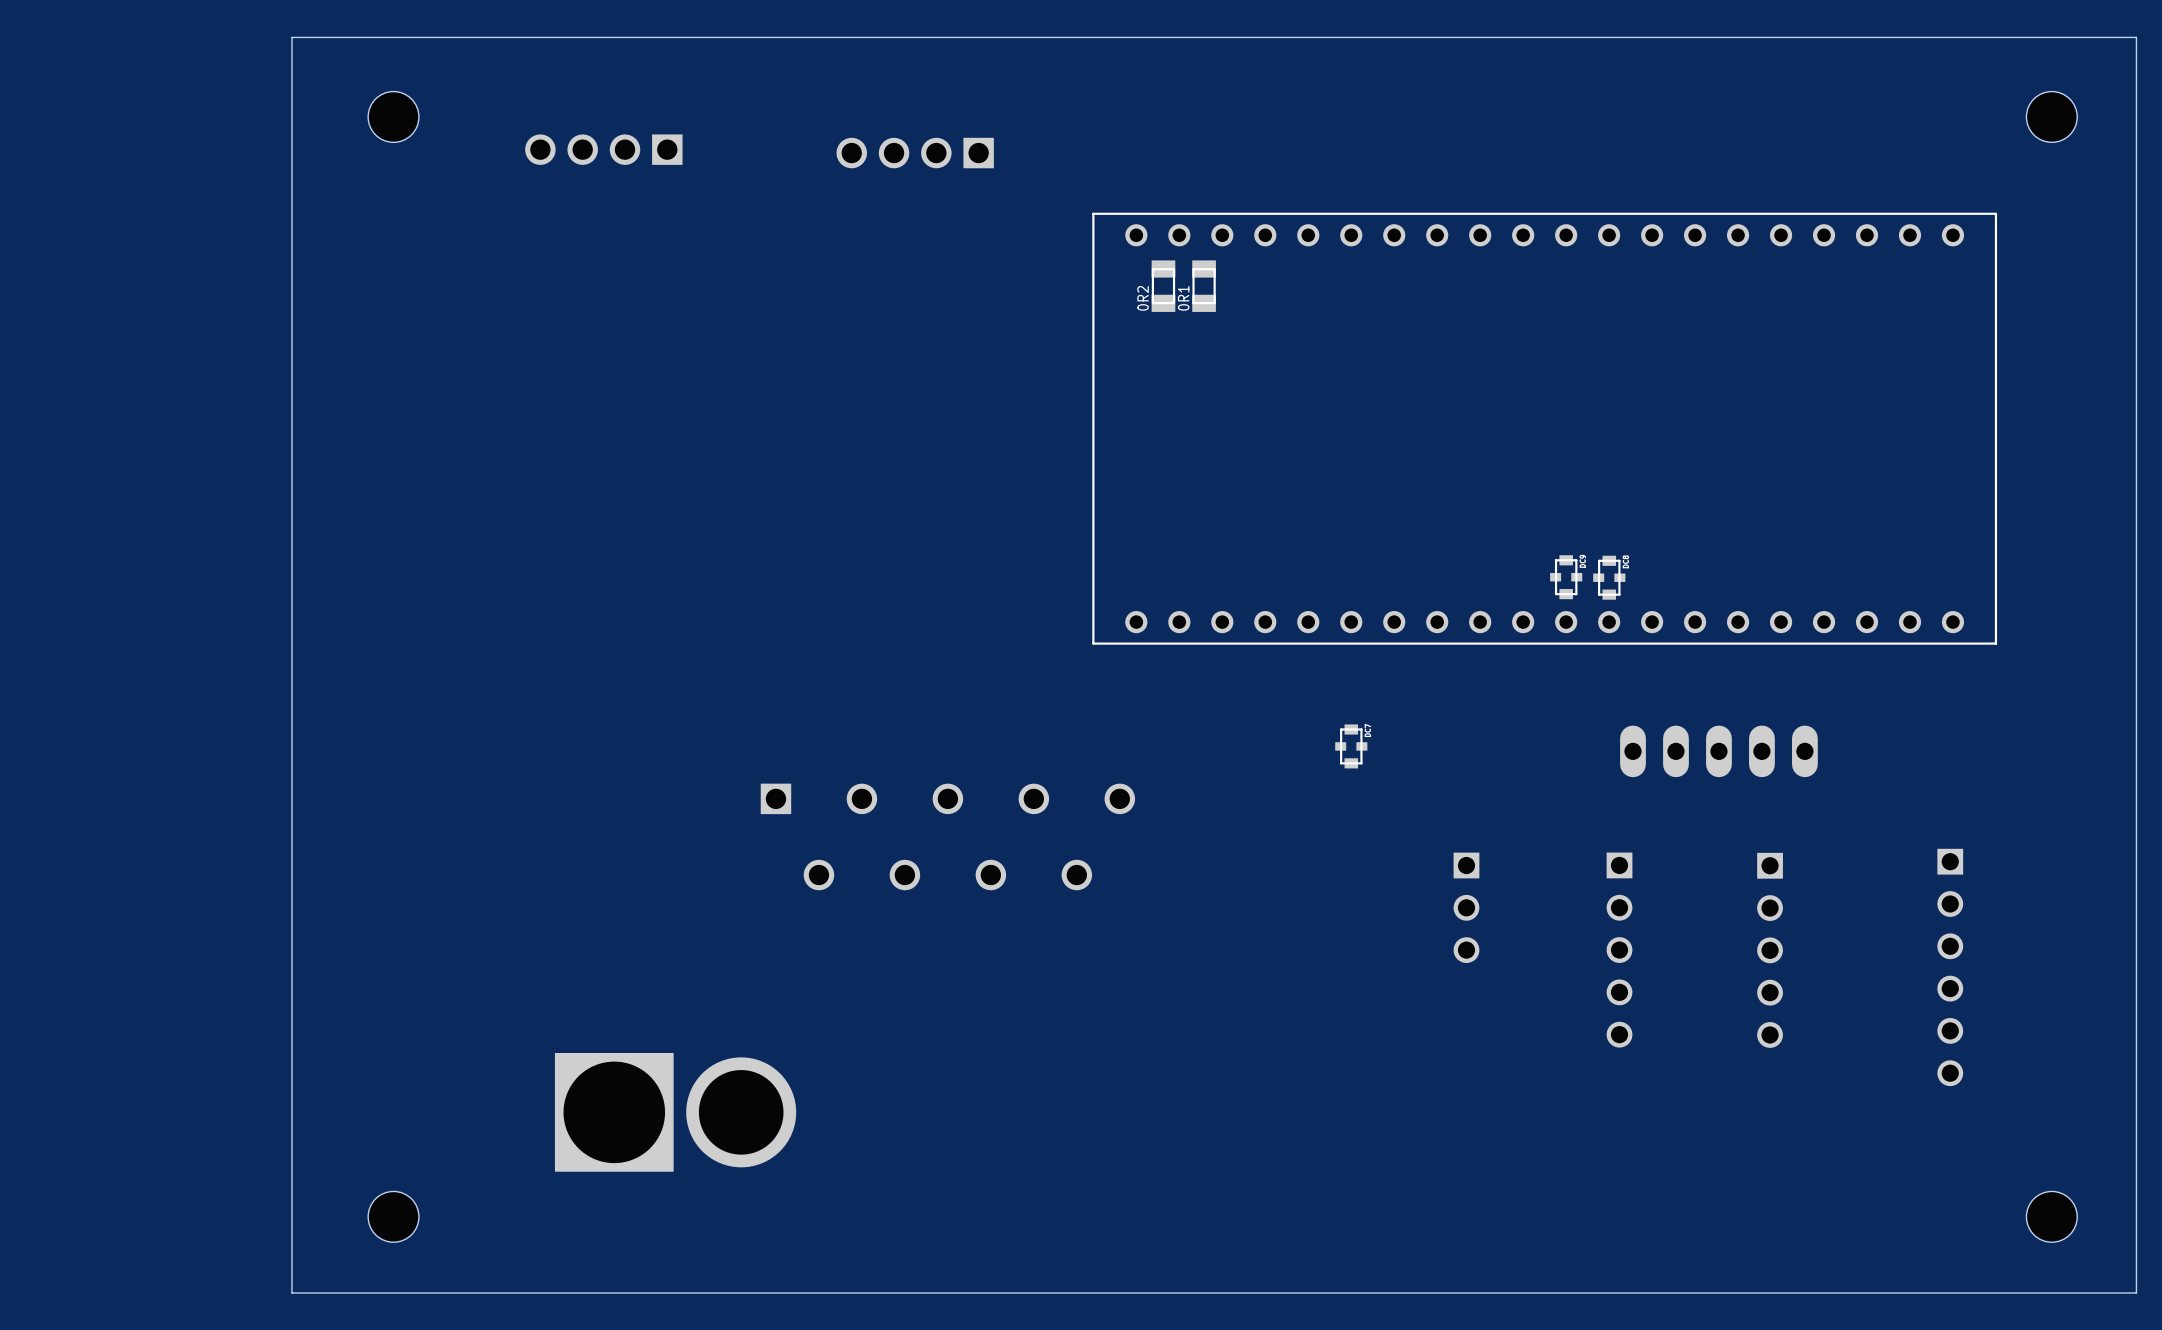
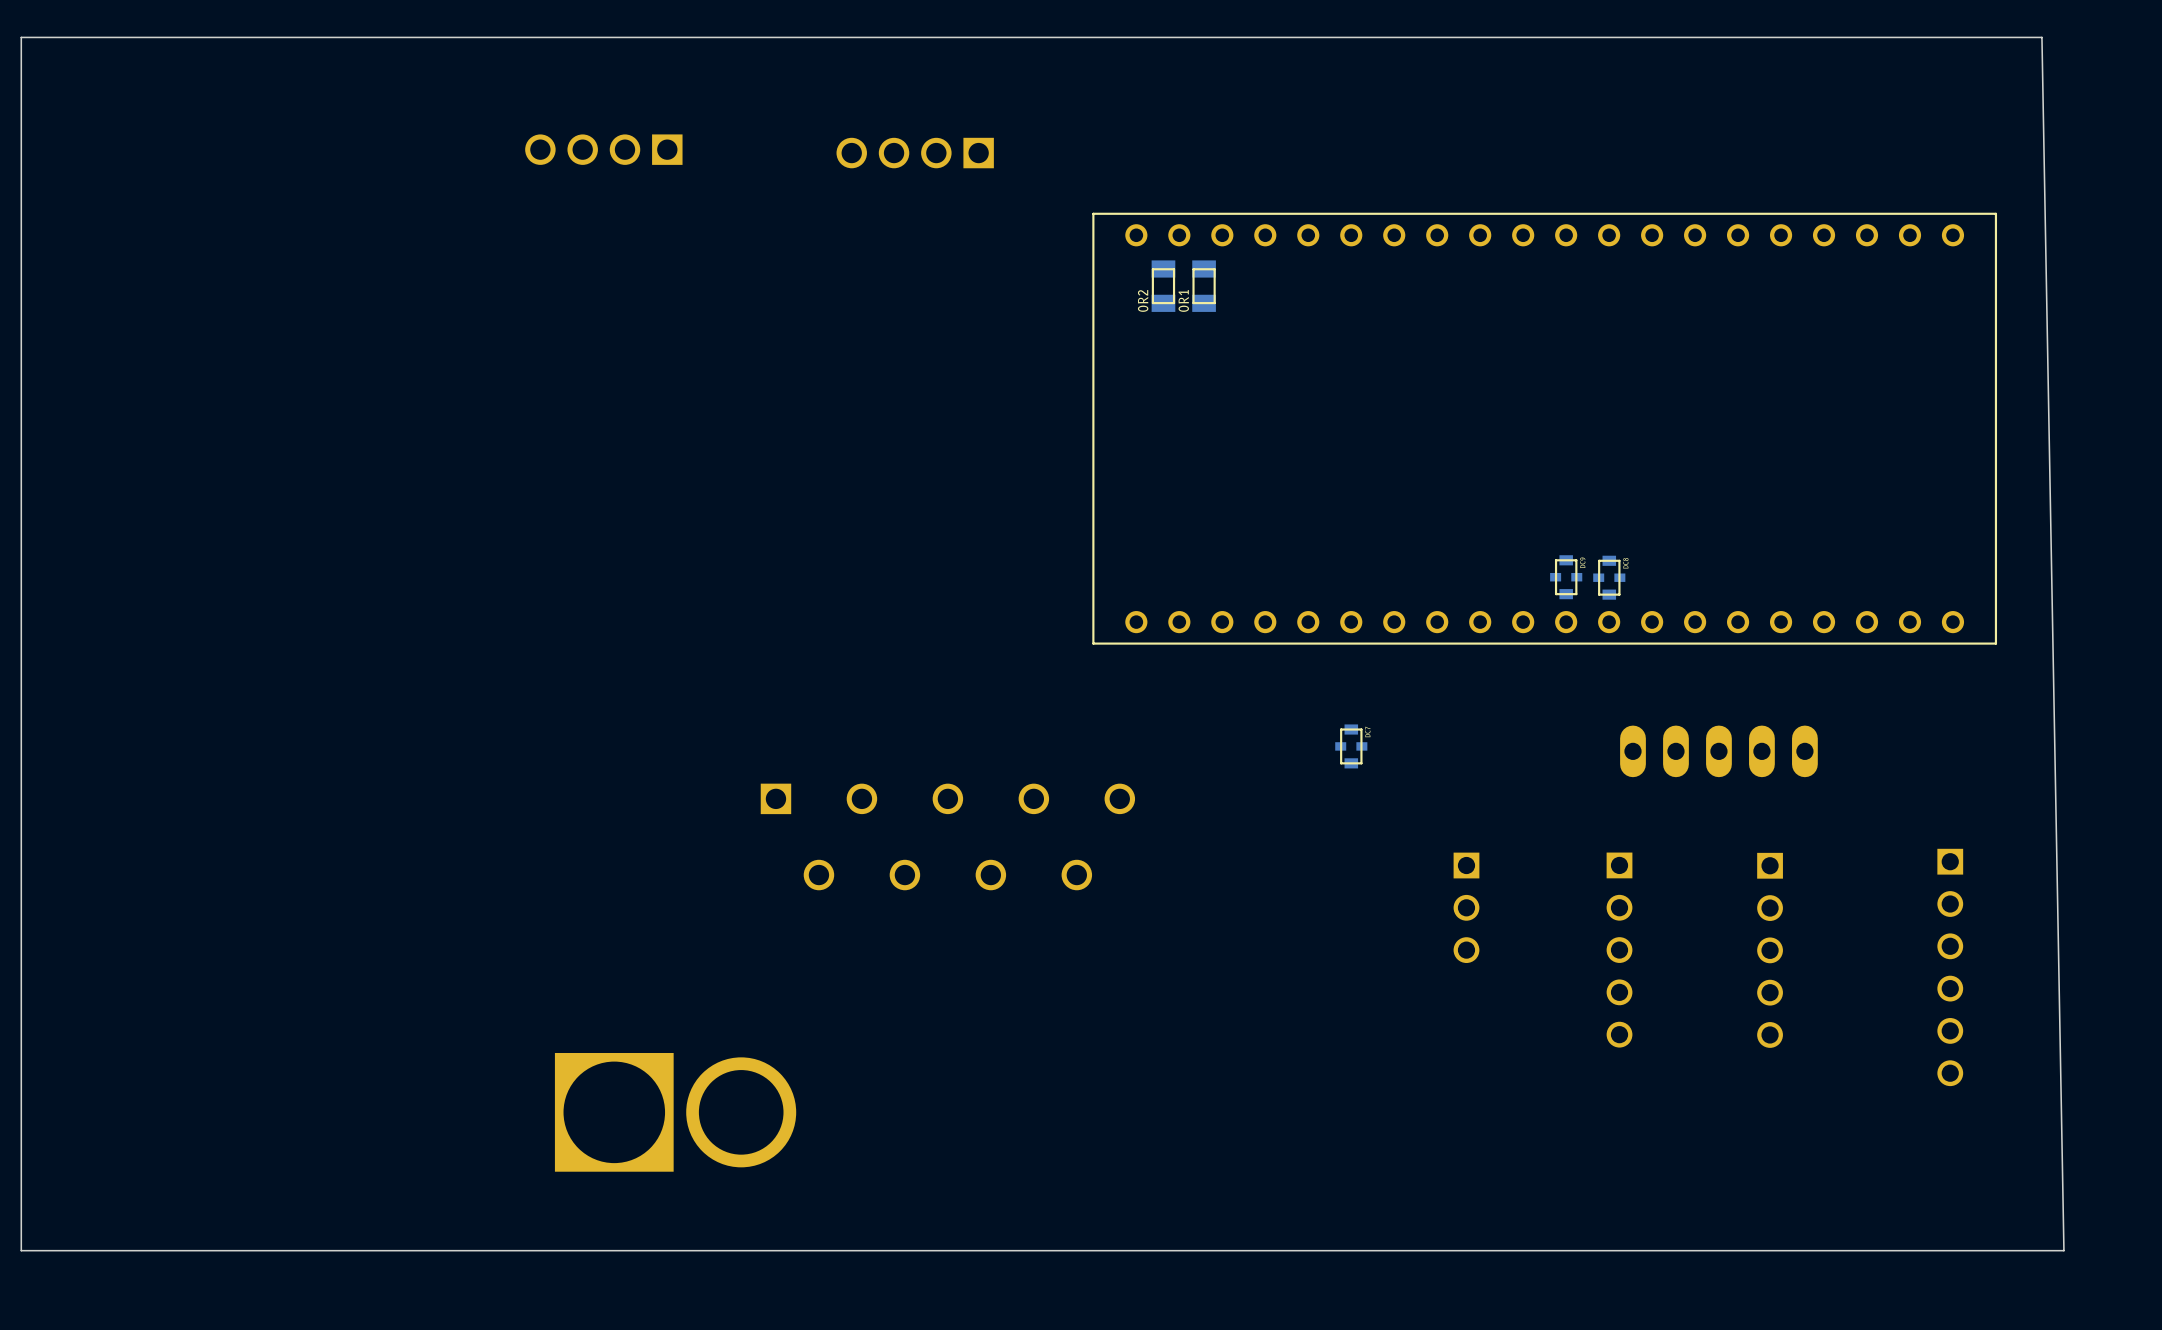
board edge: (2041, 37) (2136, 37) (2136, 1292) (292, 1292) (292, 37) -> (2041, 37) (2063, 1250) (21, 1250) (21, 37) (292, 37)
hole: (393, 116) -> none
hole: (2051, 116) -> none
hole: (393, 1216) -> none
hole: (2051, 1216) -> none

